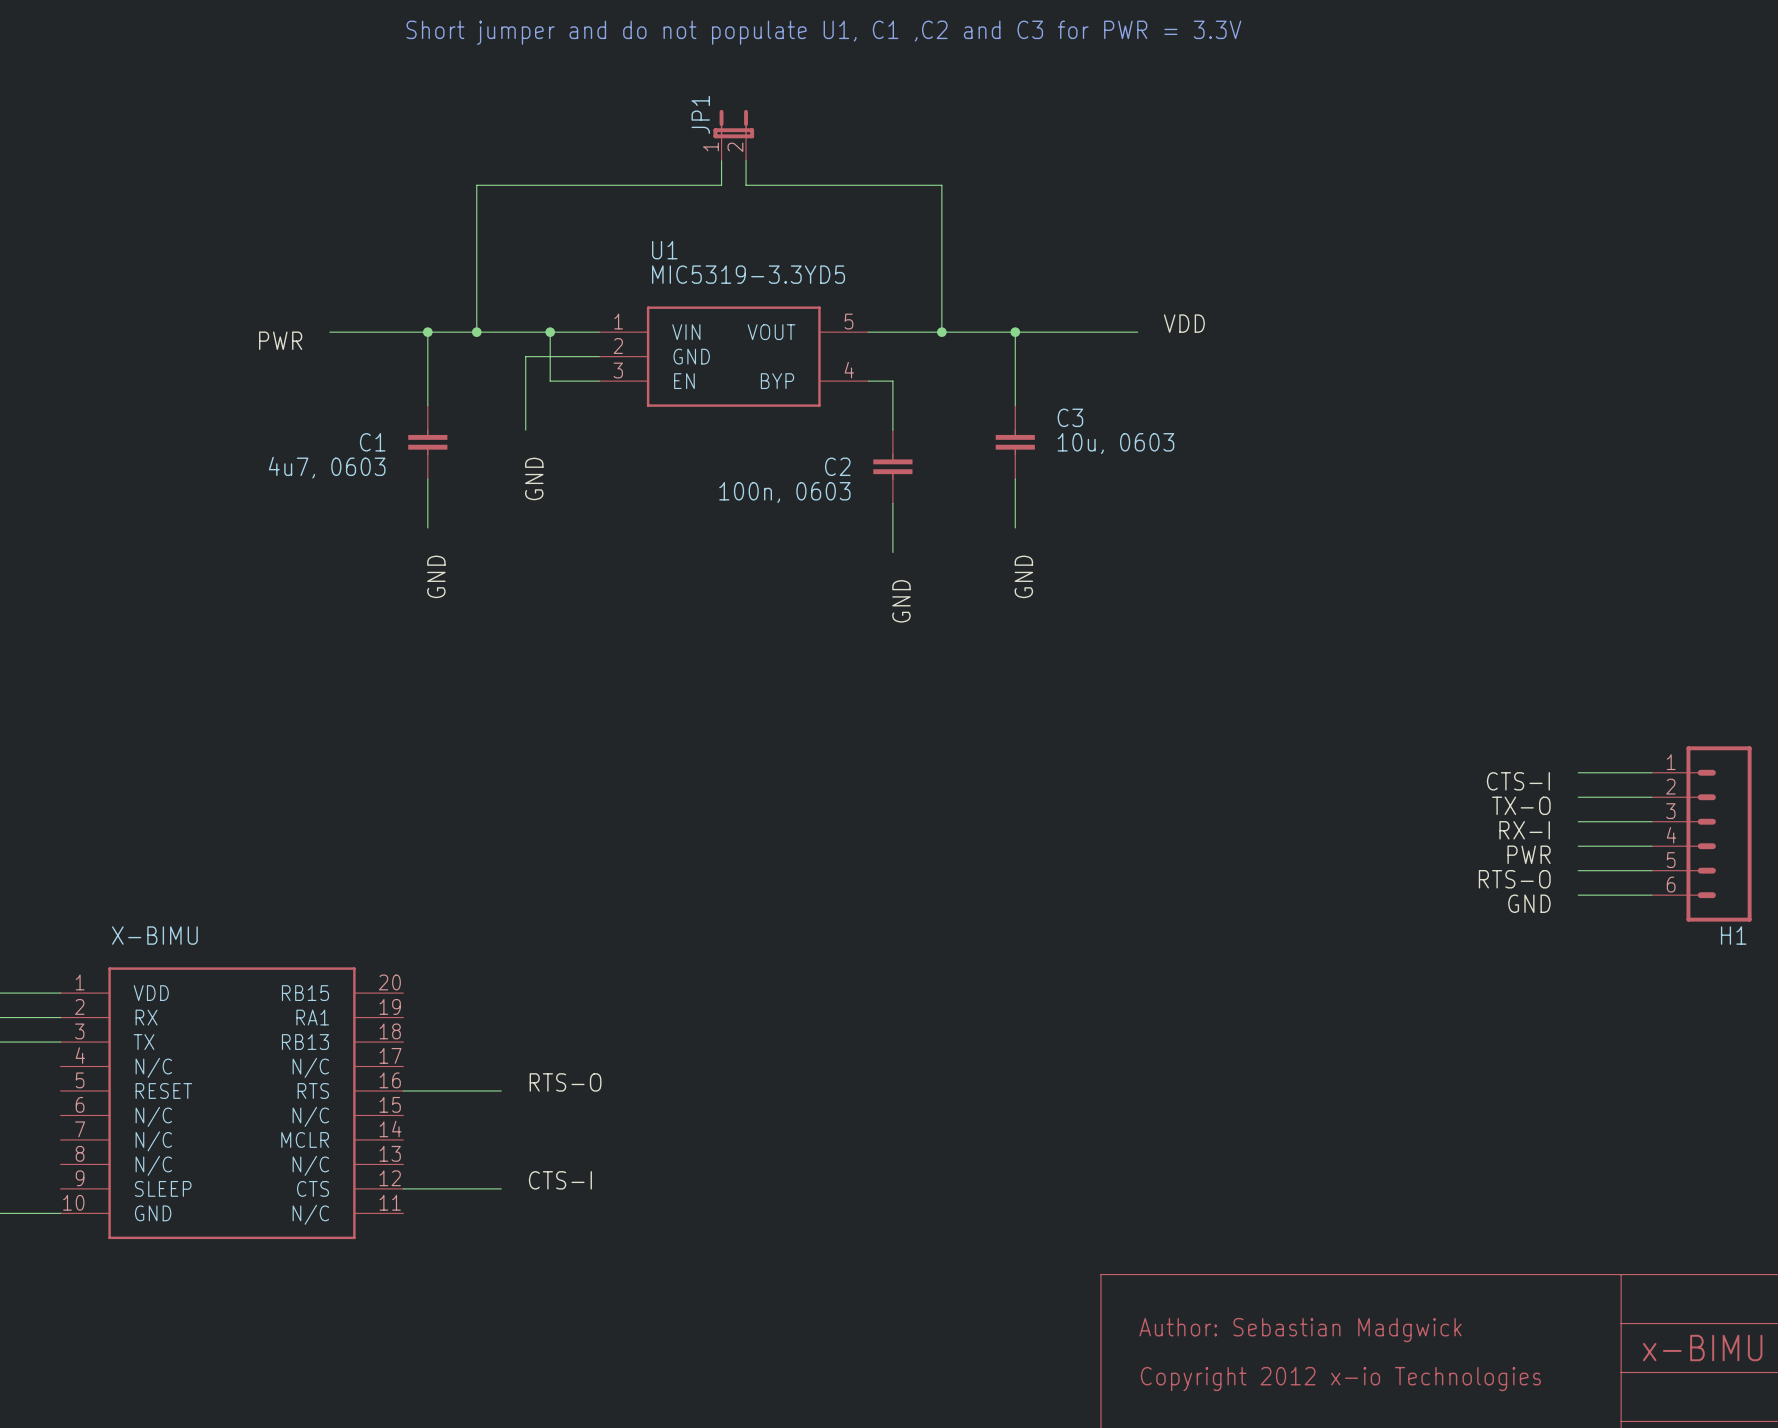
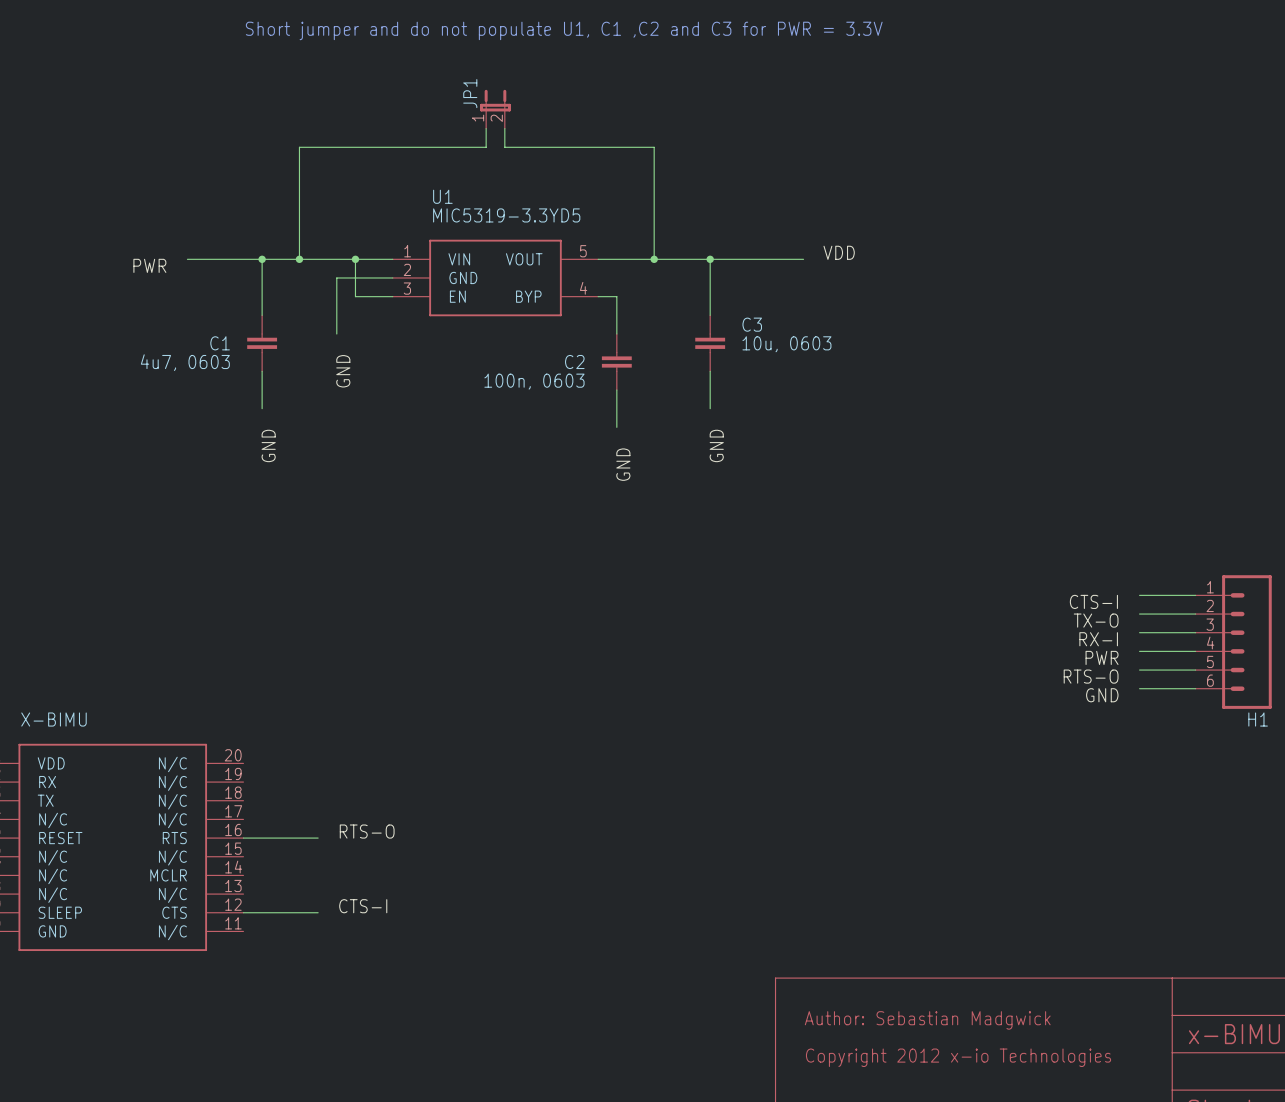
part pin name: RB15 (305, 993) -> N/C (172, 764)
part pin name: RA1 (312, 1017) -> N/C (172, 783)
part pin name: RB13 (305, 1042) -> N/C (172, 801)

